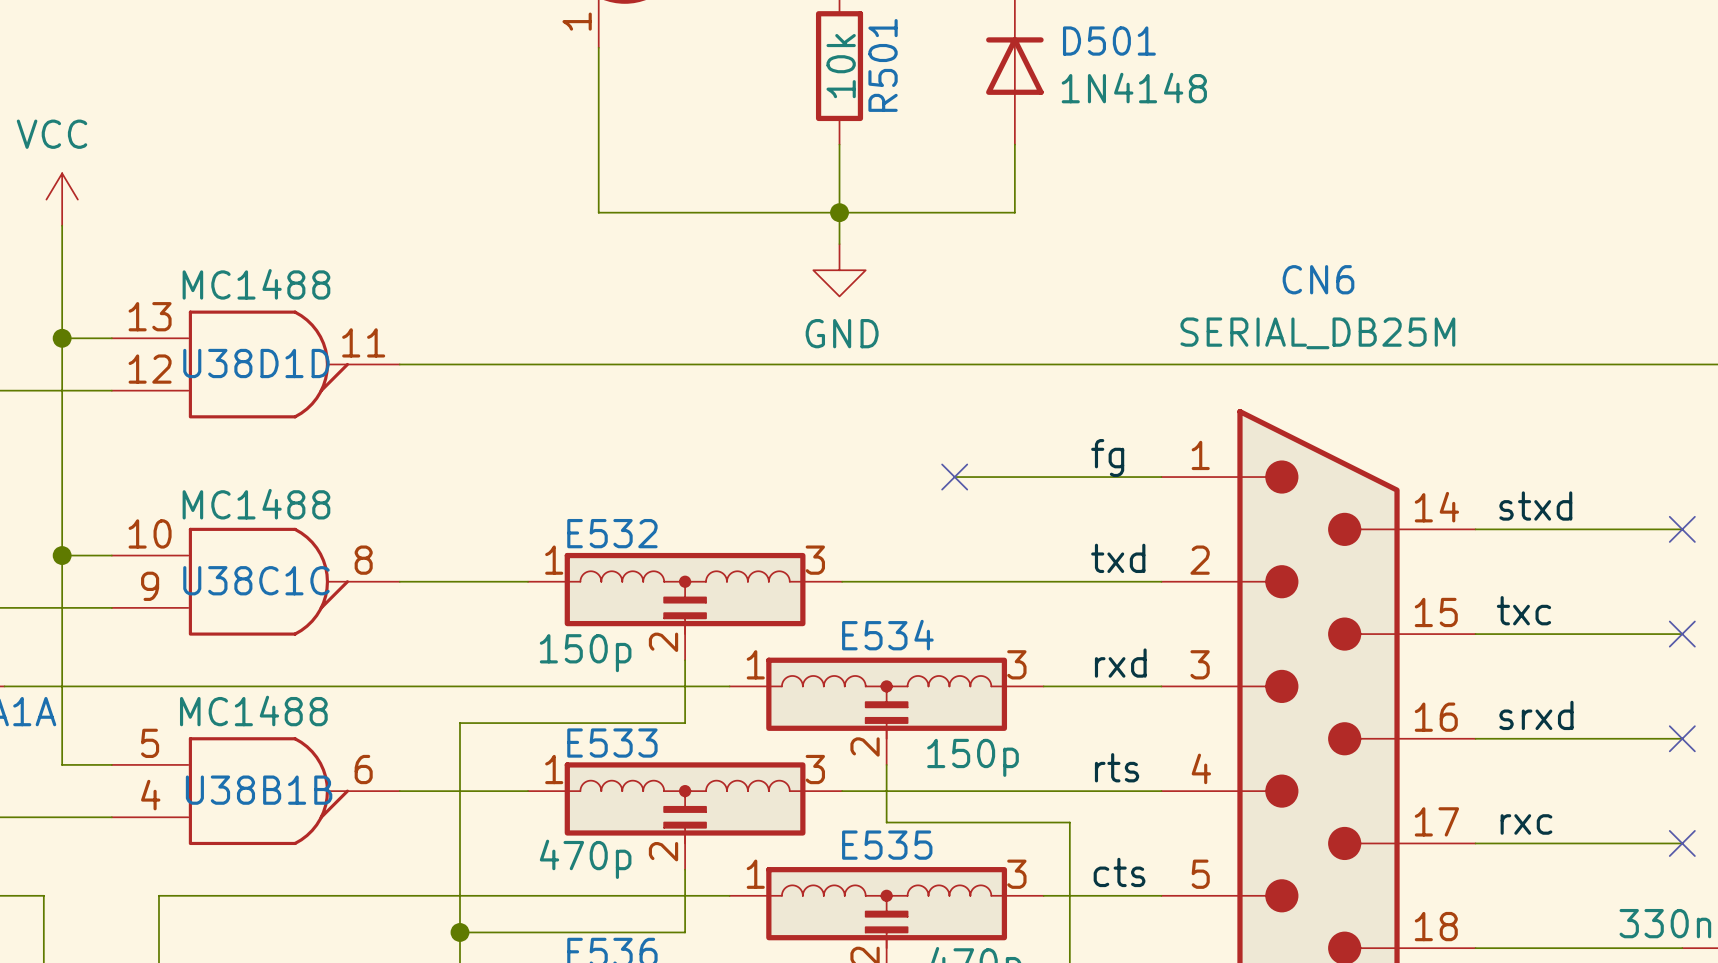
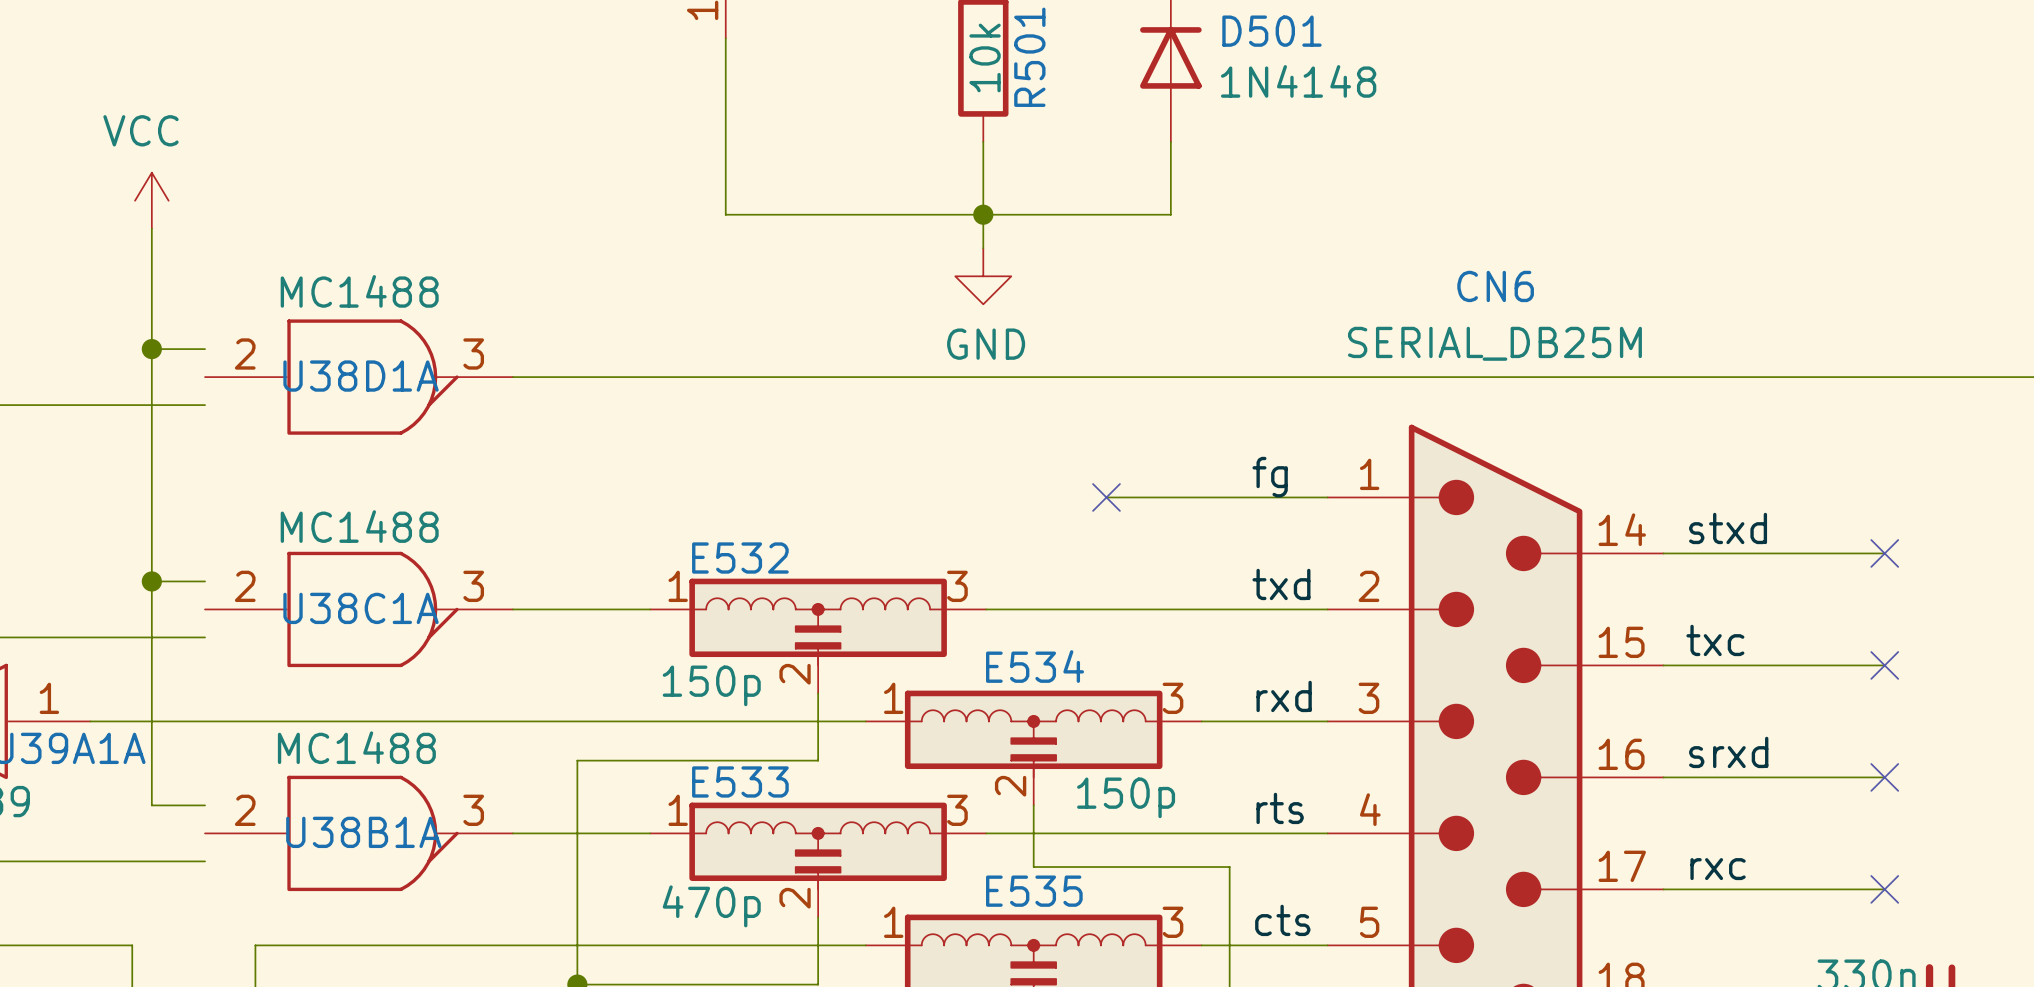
U38D1D: MC1488 (255, 364) -> none
U38D1A: none -> MC1488 (359, 377)
U38C1C: MC1488 (255, 581) -> none
U38C1A: none -> MC1488 (359, 609)
U38B1B: MC1488 (255, 791) -> none
U38B1A: none -> MC1488 (359, 833)

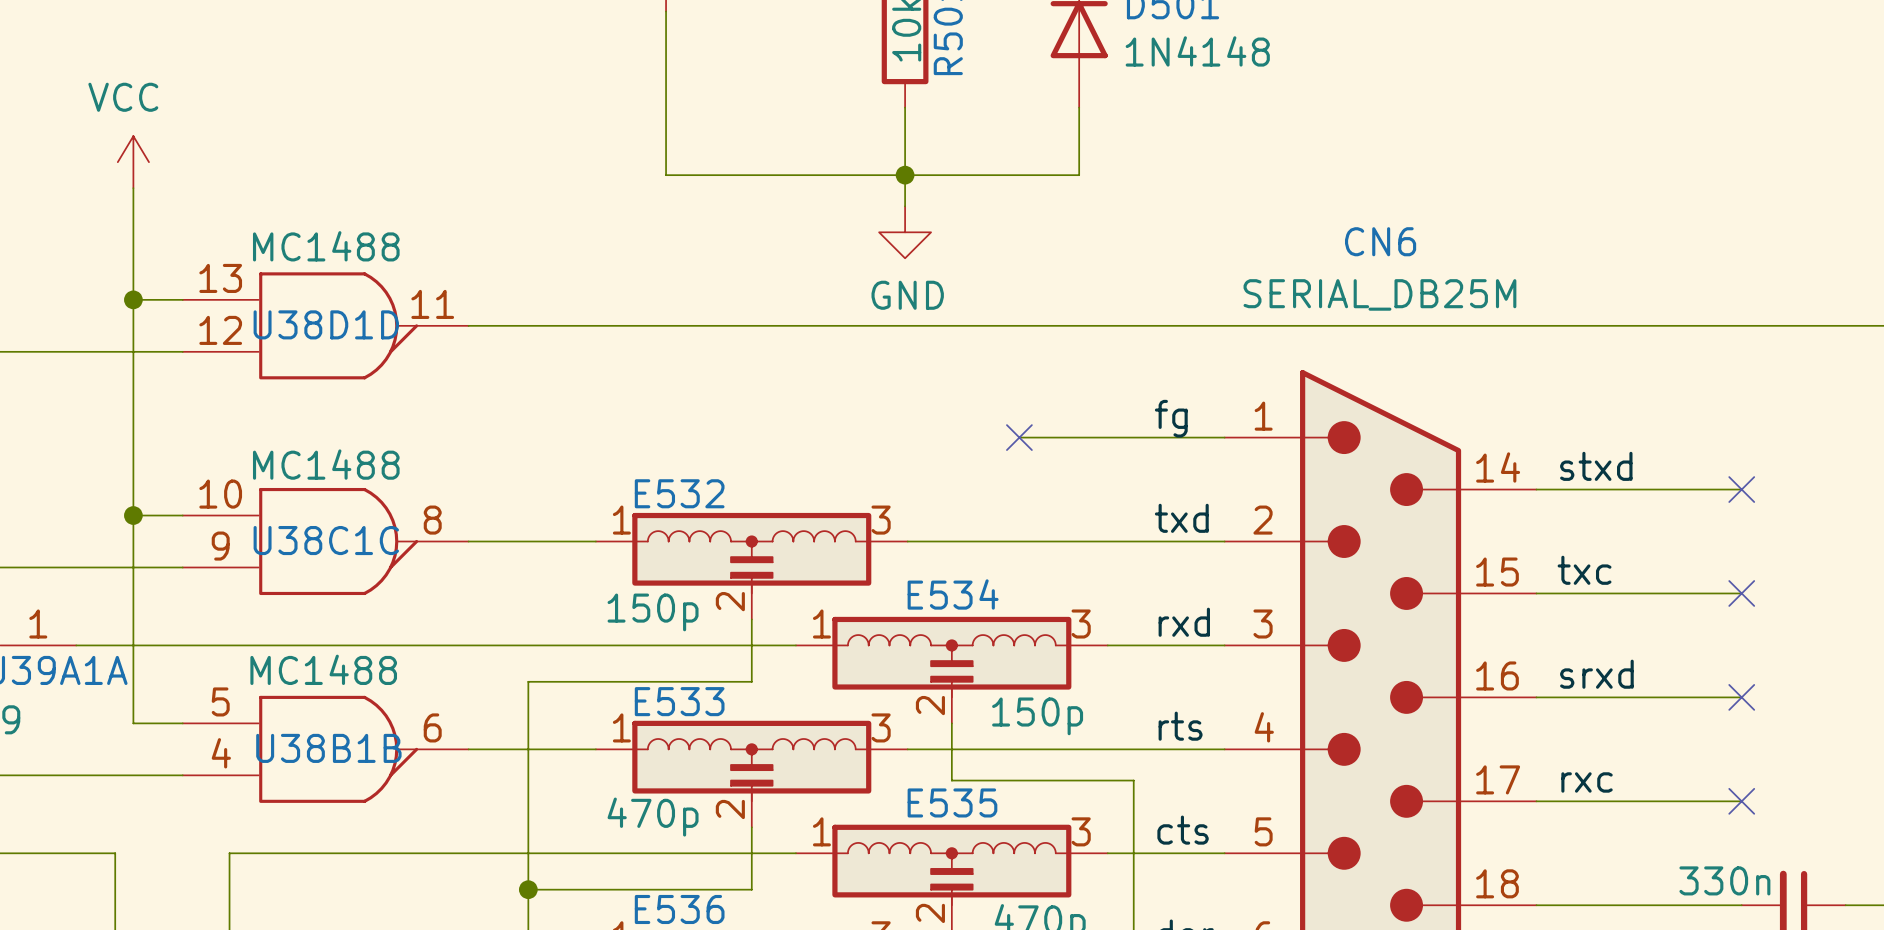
U38D1A: MC1488 (359, 377) -> none
U38D1D: none -> MC1488 (325, 325)
U38C1A: MC1488 (359, 609) -> none
U38C1C: none -> MC1488 (325, 541)
U38B1A: MC1488 (359, 833) -> none
U38B1B: none -> MC1488 (325, 749)

